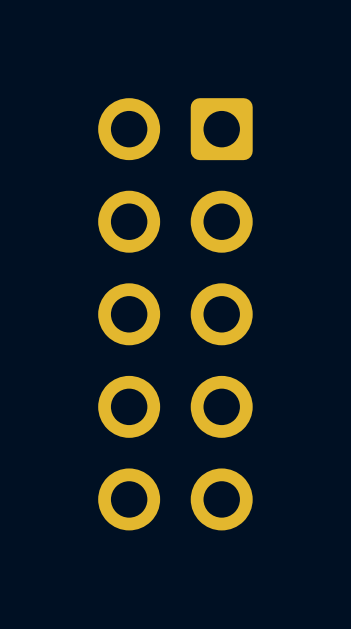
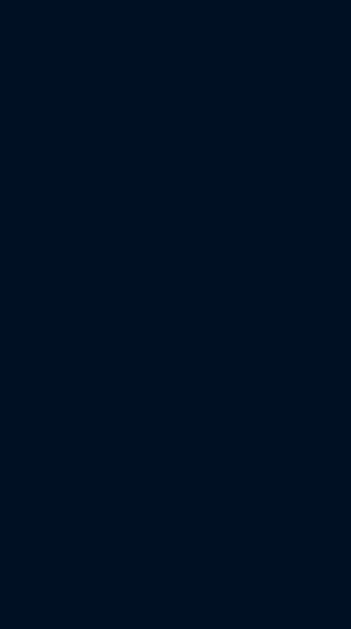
part: (175, 314) -> none

